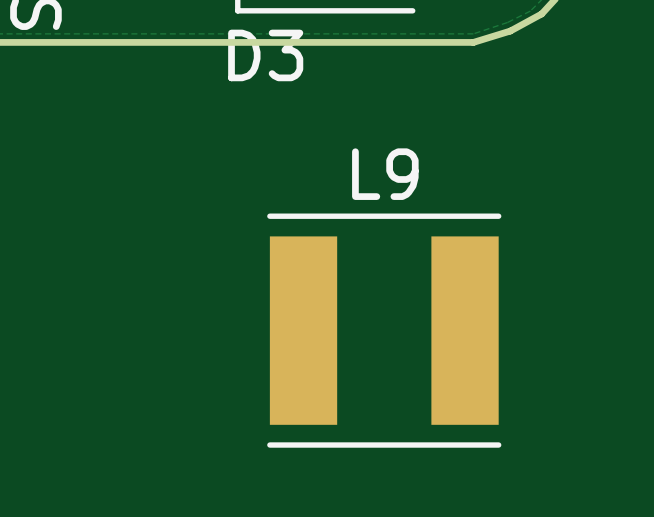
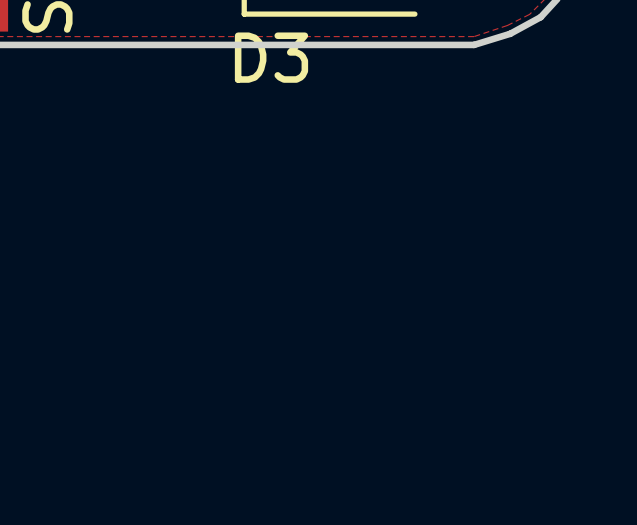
L9: (384, 330) -> none

